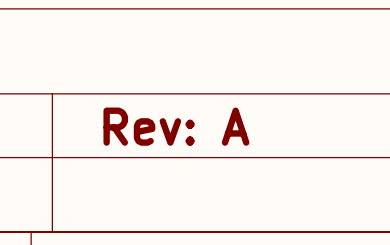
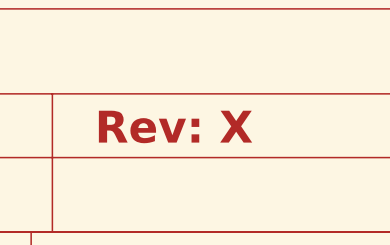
title block: Rev: A (176, 126) -> Rev: X (175, 126)

